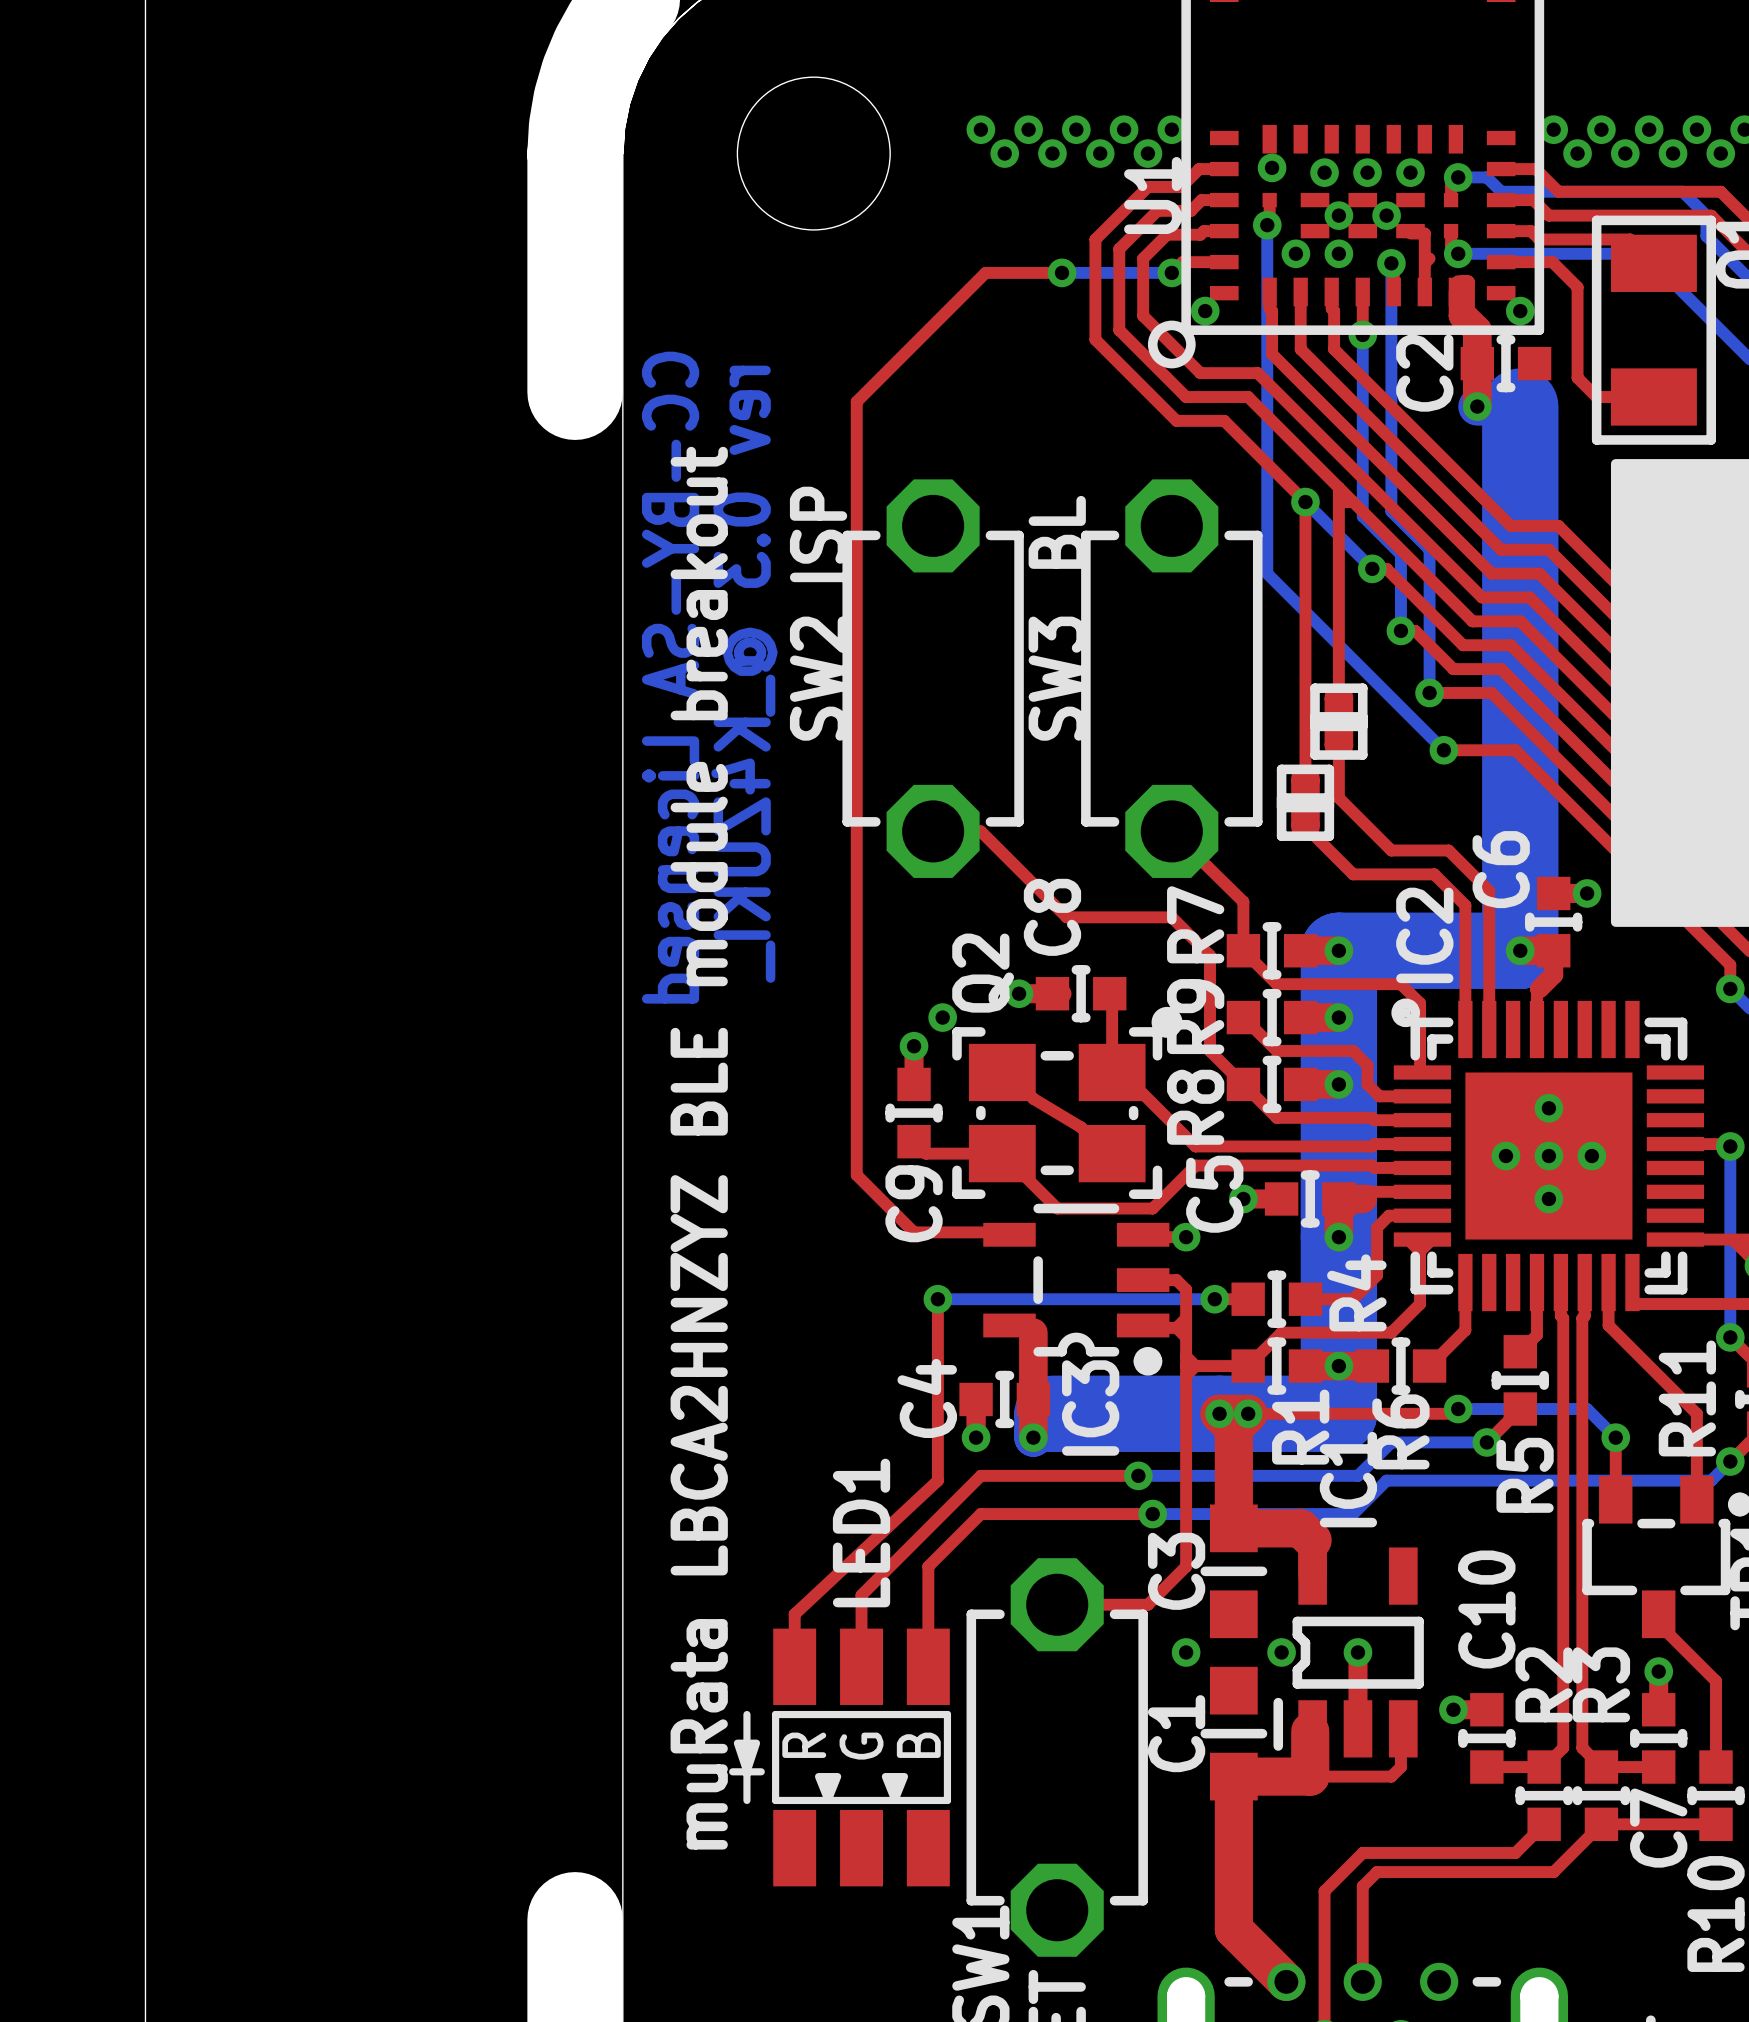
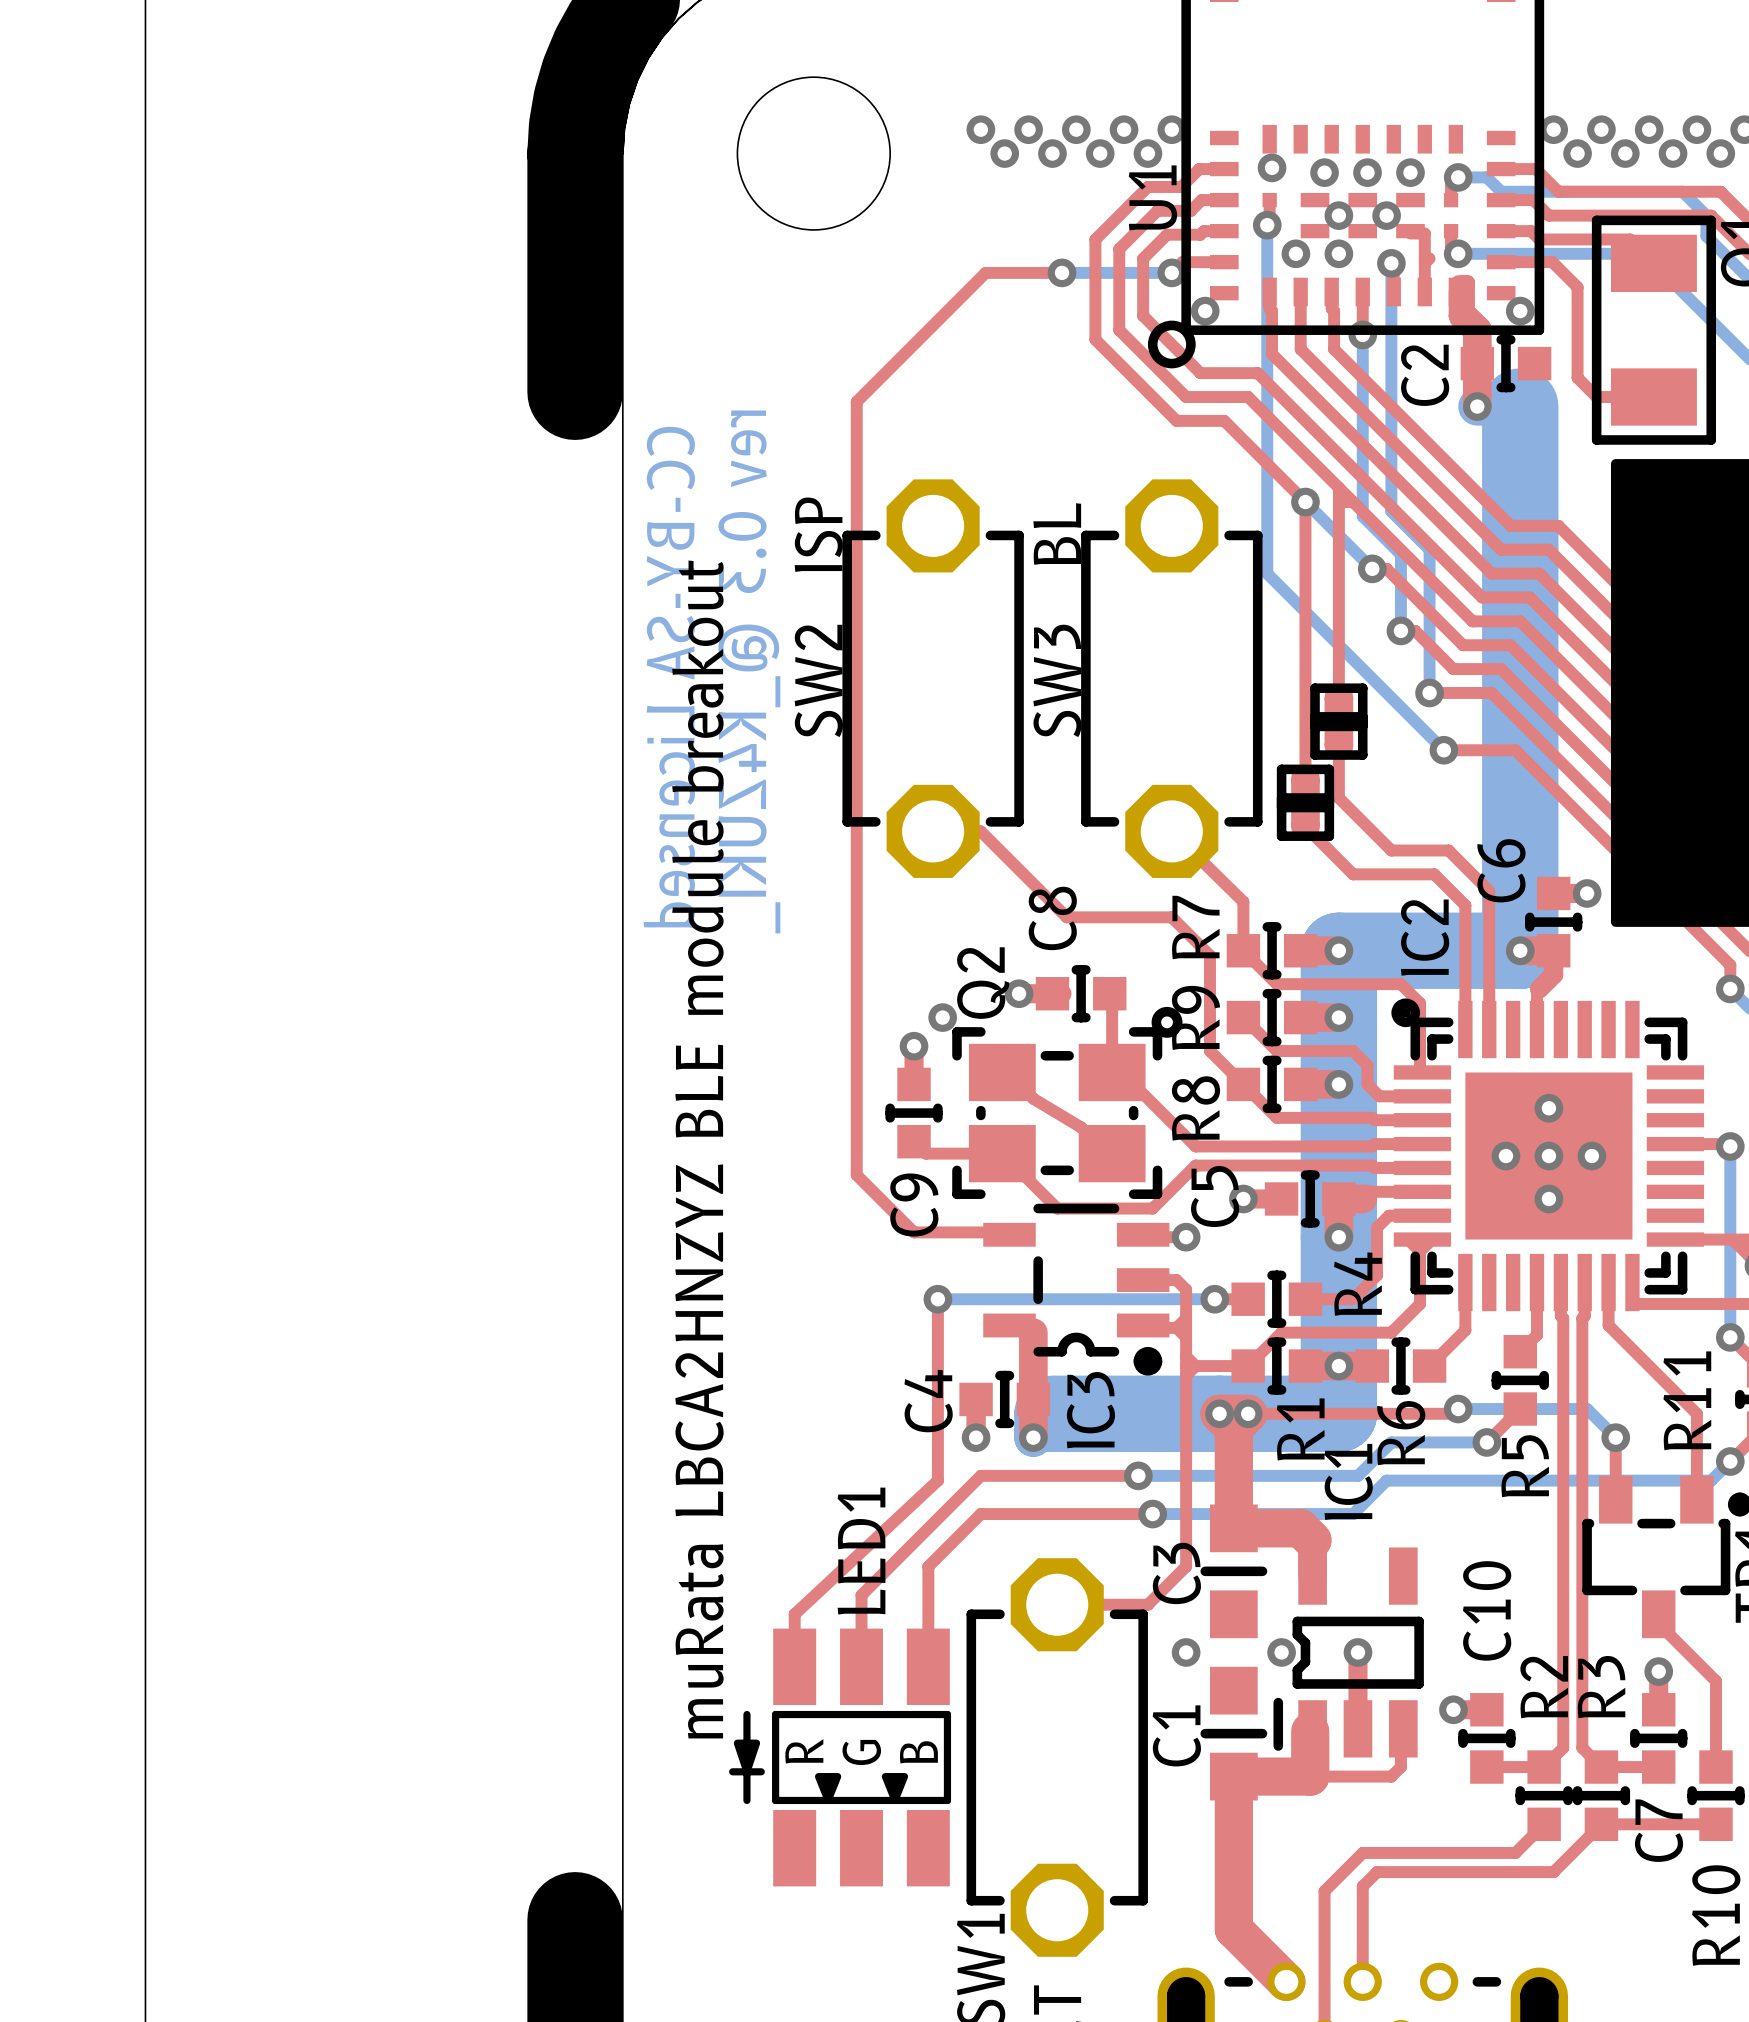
Q2 footprint: [952, 1006, 1183, 1199] -> [952, 1006, 1183, 1199]

